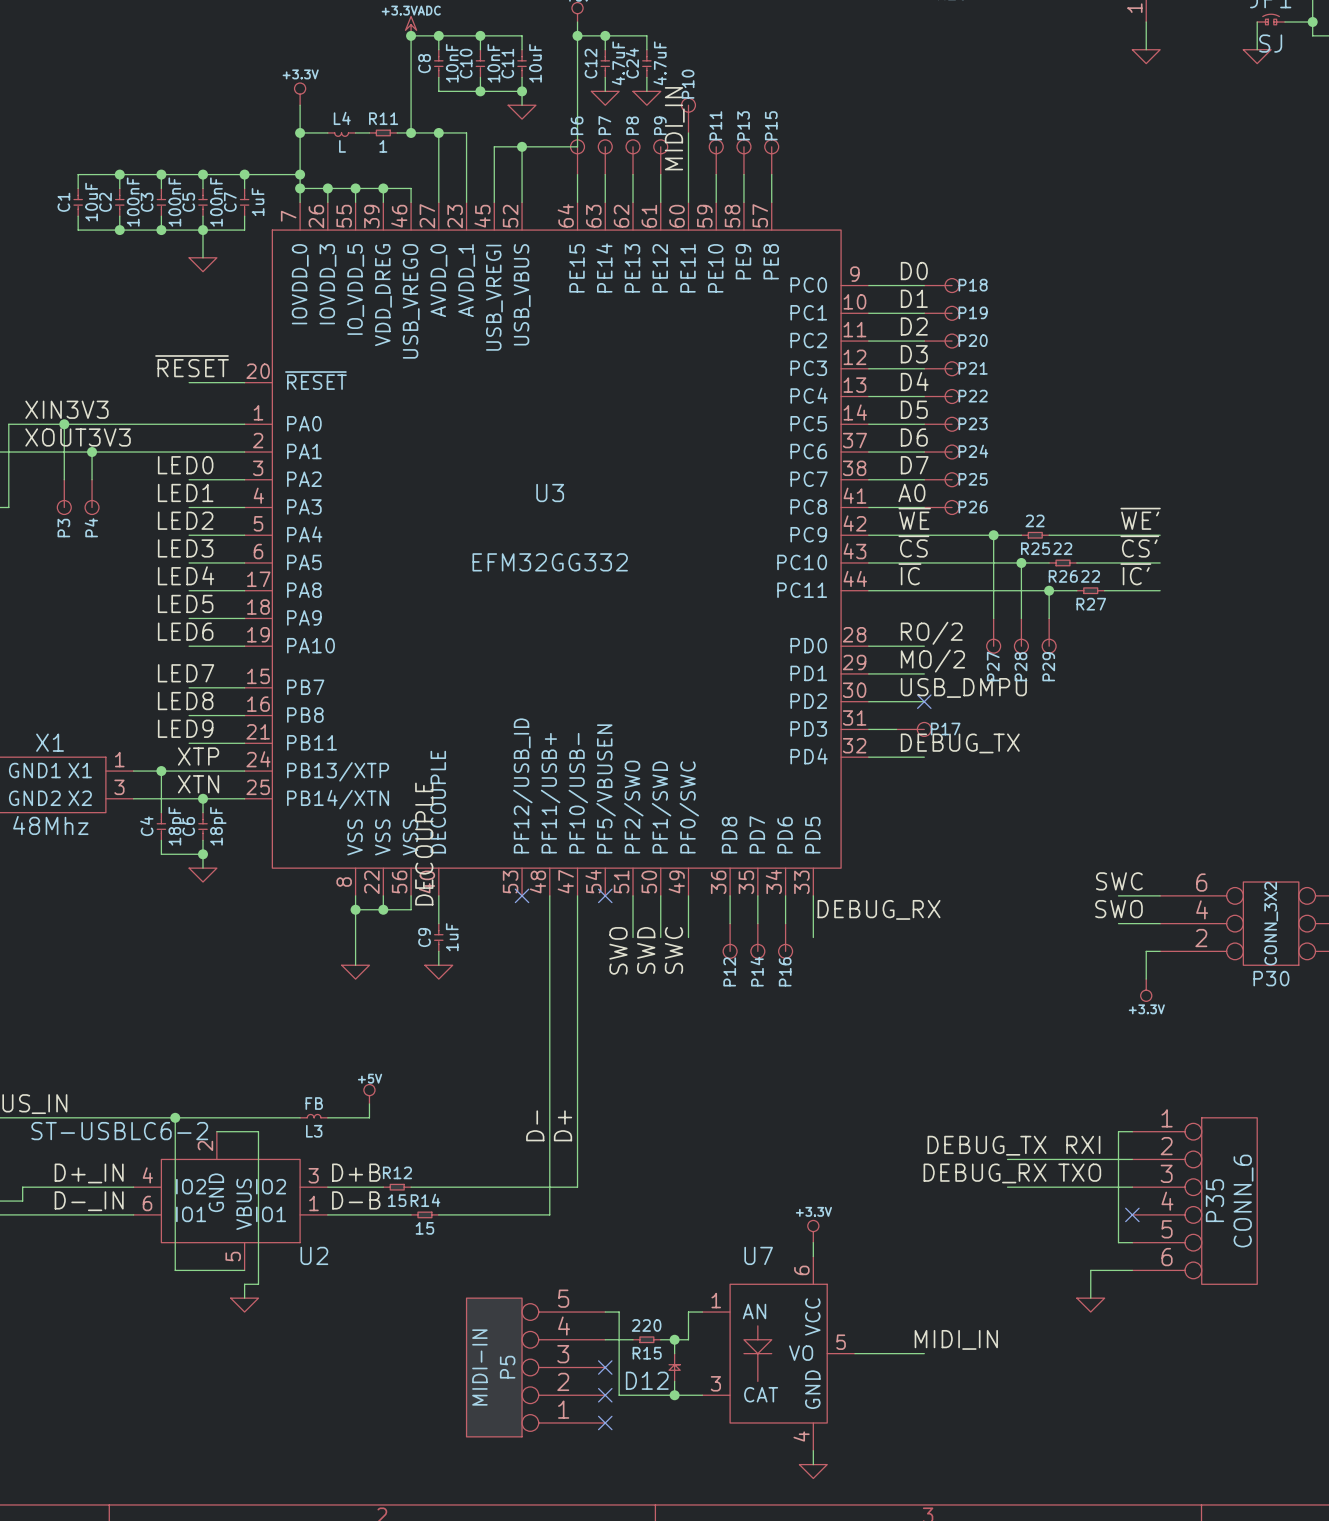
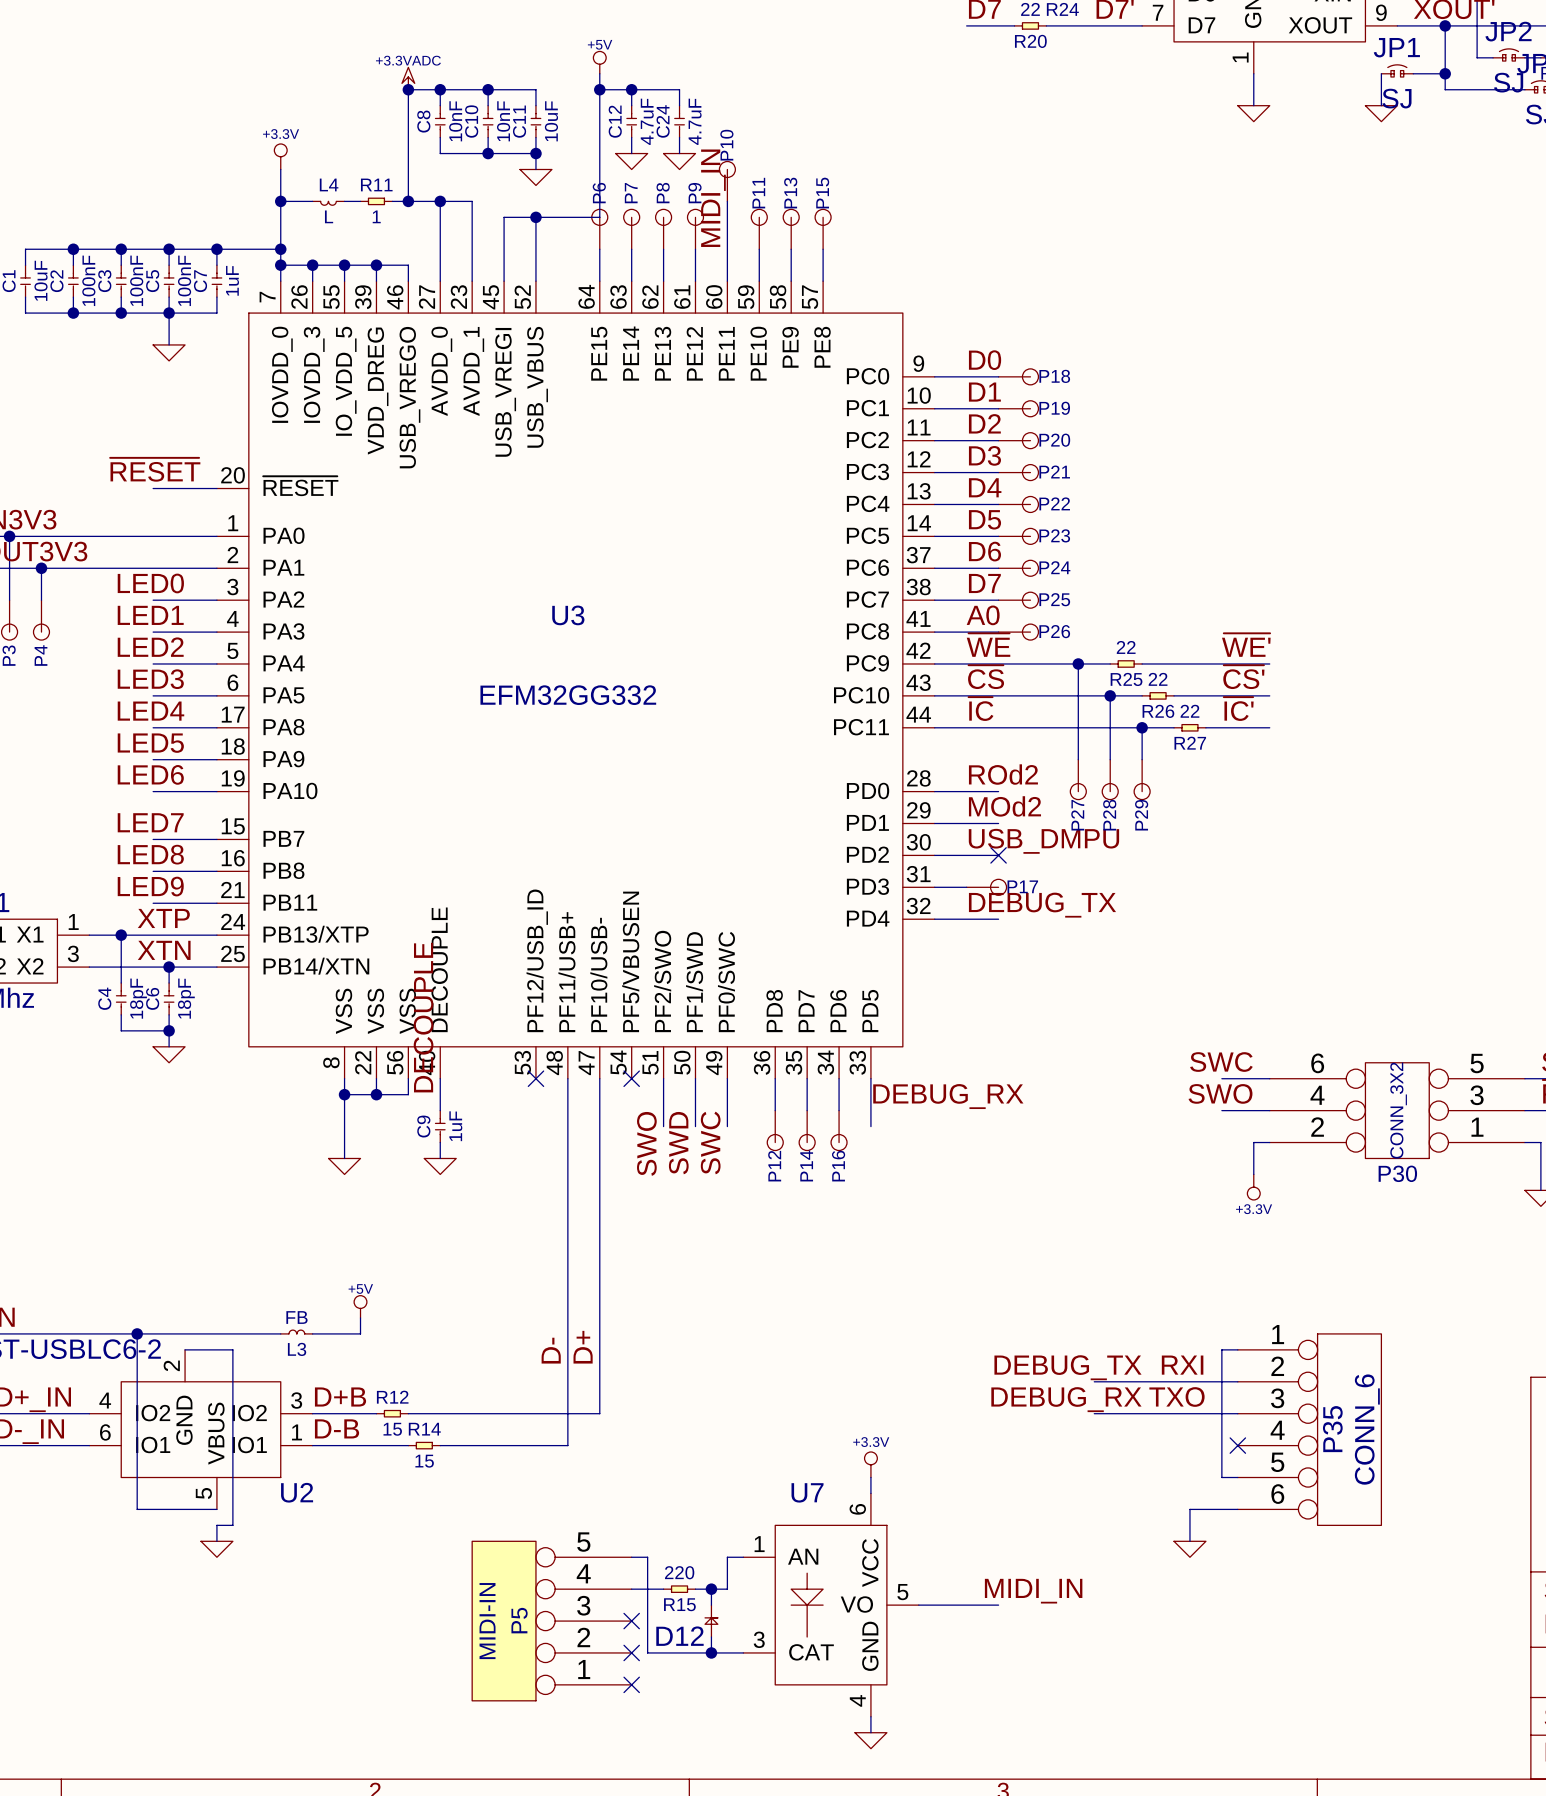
label: RO/2 (931, 633) -> ROd2 (1003, 774)
label: MO/2 (932, 661) -> MOd2 (1004, 806)

